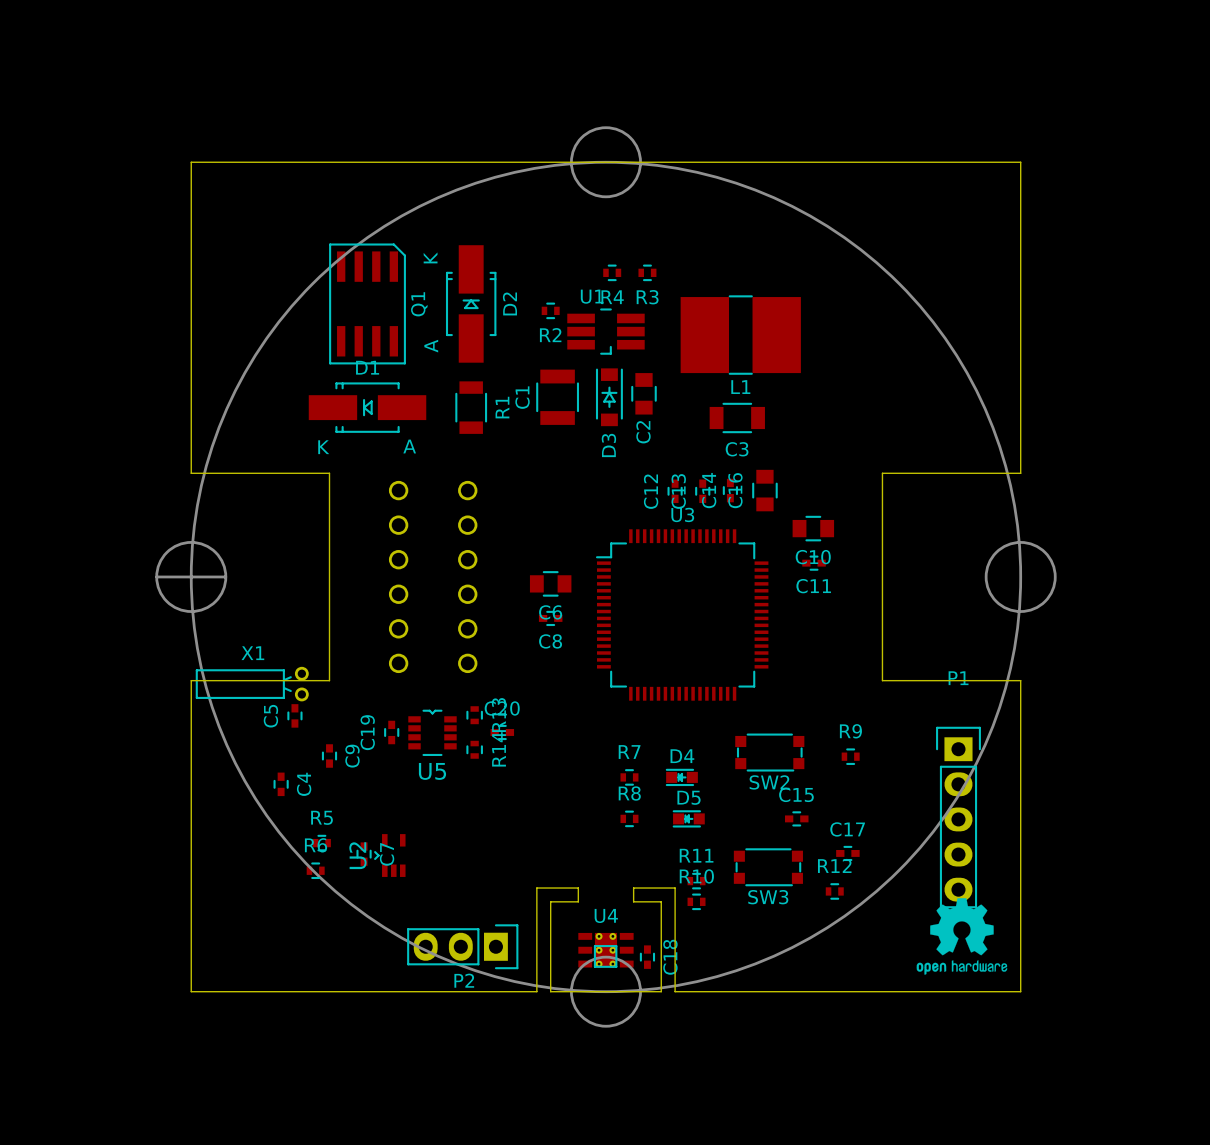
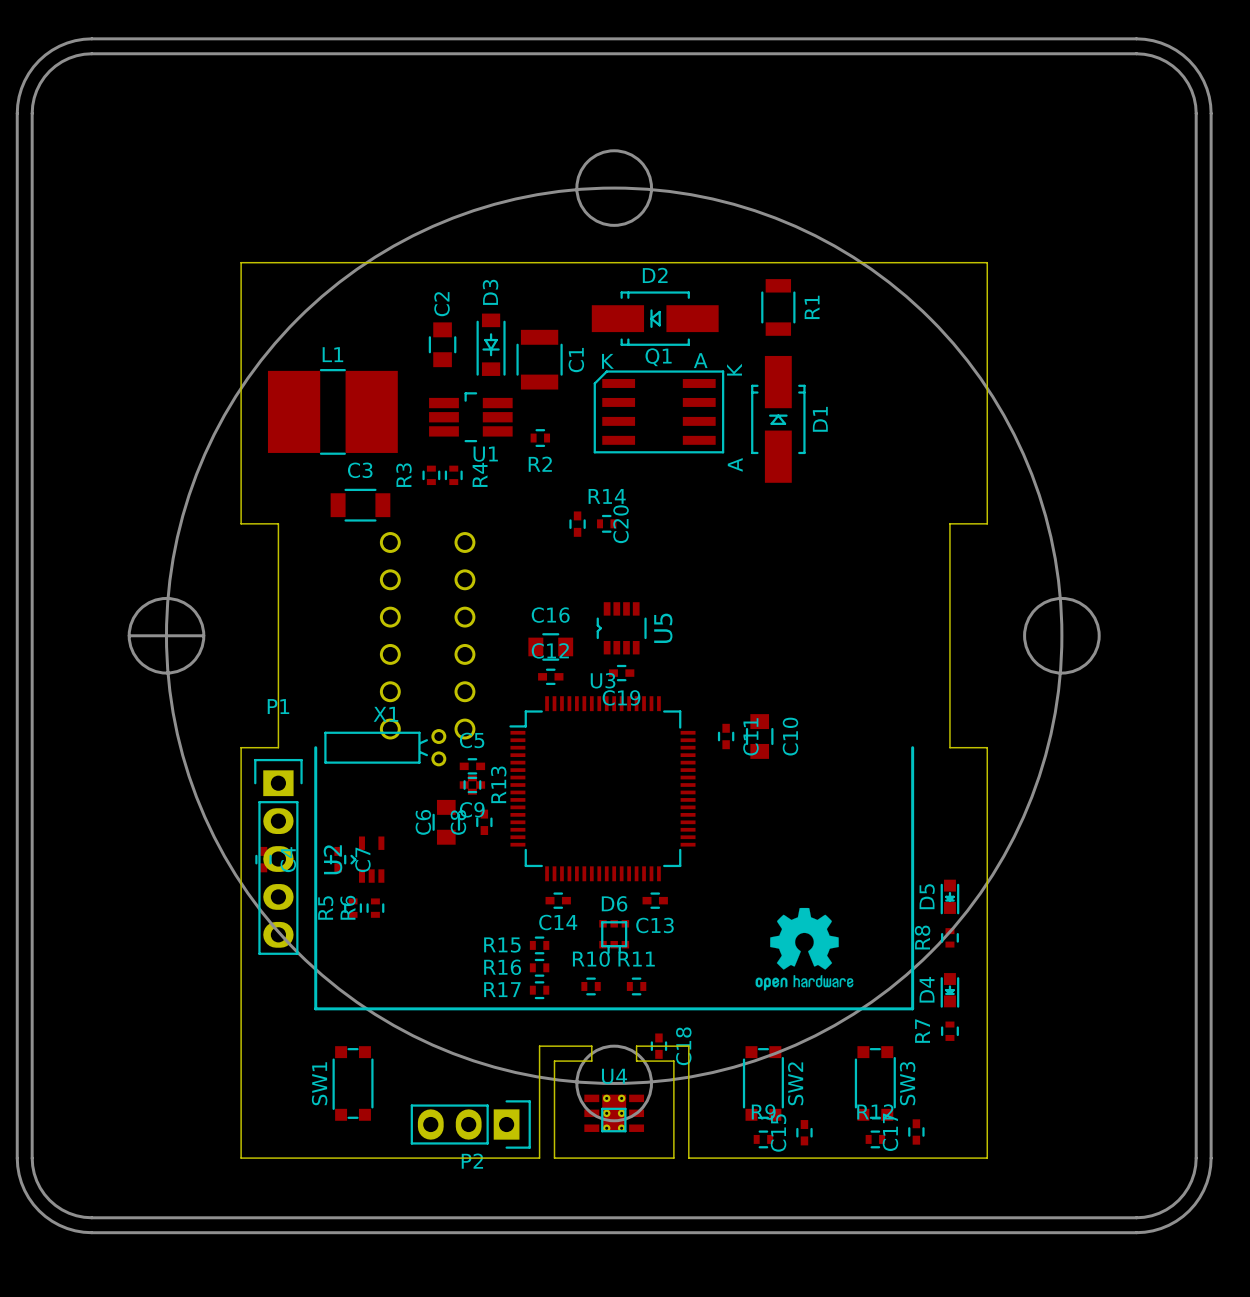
line: none -> (91, 38) (1136, 38) (1161, 43) (1176, 50) (1189, 60) (1199, 73) (1206, 88) (1211, 113) (1211, 1158) (1206, 1182) (1199, 1197) (1189, 1210) (1176, 1221) (1161, 1228) (1136, 1232) (91, 1232) (67, 1228) (52, 1221) (39, 1210) (28, 1197) (21, 1182) (17, 1158) (17, 113) (21, 88) (28, 73) (39, 60) (59, 46) (75, 40) (91, 38)
line: none -> (91, 53) (1136, 53) (1159, 58) (1178, 71) (1191, 90) (1196, 113) (1196, 1158) (1191, 1180) (1178, 1200) (1159, 1213) (1136, 1217) (91, 1217) (69, 1213) (49, 1200) (36, 1180) (32, 1158) (32, 113) (36, 90) (49, 71) (69, 58) (91, 53)
R4 rotation: 0° (612, 272) -> 90° clockwise (453, 475)
R4 position: (612, 272) -> (453, 475)
R3 rotation: 0° (647, 272) -> 90° clockwise (431, 475)
R3 position: (647, 272) -> (431, 475)
R4 name position: R4 (612, 297) -> R4 (480, 474)
Q1 rotation: 0° (367, 303) -> 90° counterclockwise (658, 411)
Q1 position: (367, 303) -> (658, 411)
D2 rotation: 0° (471, 303) -> 90° counterclockwise (655, 318)
D2 position: (471, 303) -> (655, 318)
R2 position: (550, 310) -> (540, 438)
U1 rotation: 0° (605, 331) -> 180° (470, 417)
U1 position: (605, 331) -> (470, 417)
L1 position: (740, 335) -> (332, 411)
L1 name position: L1 (740, 387) -> L1 (332, 354)
C2 position: (643, 393) -> (442, 344)
C1 name position: C1 (522, 397) -> C1 (576, 360)
C1 position: (557, 397) -> (539, 359)
D3 rotation: 0° (609, 397) -> 180° (491, 344)
D3 position: (609, 397) -> (491, 344)
D1 rotation: 0° (367, 407) -> 90° clockwise (778, 419)
D1 position: (367, 407) -> (778, 419)
R1 position: (471, 407) -> (778, 307)
C3 position: (737, 418) -> (360, 505)
C2 name position: C2 (643, 432) -> C2 (442, 304)
C3 name position: C3 (737, 449) -> C3 (360, 470)
board edge: (260, 473) (191, 473) (191, 162) (1020, 162) (1020, 473) (951, 473) -> (241, 523) (241, 262) (987, 262) (987, 523)
board edge: (294, 473) (329, 473) (329, 680) (294, 680) -> (278, 523) (278, 747)
board edge: (917, 473) (882, 473) (882, 680) (917, 680) -> (949, 523) (949, 747)
C14 name position: C14 (709, 490) -> C14 (558, 922)
C14 rotation: 0° (730, 490) -> 90° clockwise (558, 900)
C14 position: (730, 490) -> (558, 900)
C16 rotation: 0° (764, 490) -> 90° clockwise (550, 646)
C16 position: (764, 490) -> (550, 646)
C12 rotation: 0° (675, 491) -> 90° clockwise (550, 676)
C12 position: (675, 491) -> (550, 676)
C13 name position: C13 (678, 491) -> C13 (654, 925)
C13 rotation: 0° (702, 491) -> 90° clockwise (655, 900)
C13 position: (702, 491) -> (655, 900)
C10 rotation: 0° (813, 528) -> 90° clockwise (759, 736)
C10 position: (813, 528) -> (759, 736)
C10 name position: C10 (813, 557) -> C10 (790, 736)
C11 rotation: 0° (814, 563) -> 90° clockwise (726, 736)
C11 position: (814, 563) -> (726, 736)
C6 rotation: 0° (550, 583) -> 90° clockwise (446, 822)
C6 position: (550, 583) -> (446, 822)
C11 name position: C11 (813, 586) -> C11 (750, 736)
U3 position: (682, 614) -> (602, 788)
C8 rotation: 0° (550, 618) -> 90° clockwise (484, 822)
C8 position: (550, 618) -> (484, 822)
board edge: (260, 680) (191, 680) (191, 991) (536, 991) -> (241, 747) (241, 1158) (539, 1158) (539, 1083)
line: none -> (315, 747) (315, 1008) (912, 1008) (912, 747)
board edge: (951, 680) (1020, 680) (1020, 991) (675, 991) -> (987, 747) (987, 1158) (688, 1158) (688, 1083)
X1 position: (252, 684) -> (385, 747)
C5 rotation: 0° (294, 715) -> 90° clockwise (472, 766)
C5 position: (294, 715) -> (472, 766)
C19 name position: C19 (367, 732) -> C19 (621, 697)
C19 rotation: 0° (391, 732) -> 90° clockwise (621, 673)
C19 position: (391, 732) -> (621, 673)
U5 rotation: 0° (432, 732) -> 90° counterclockwise (621, 628)
U5 position: (432, 732) -> (621, 628)
C20 rotation: 0° (502, 732) -> 90° clockwise (577, 524)
C20 position: (502, 732) -> (577, 524)
R14 rotation: 0° (474, 749) -> 90° clockwise (606, 523)
R14 position: (474, 749) -> (606, 523)
R14 name position: R14 (499, 749) -> R14 (607, 496)
R7 name position: R7 (629, 752) -> R7 (922, 1031)
SW2 rotation: 0° (769, 752) -> 90° counterclockwise (763, 1083)
SW2 position: (769, 752) -> (763, 1083)
C9 rotation: 0° (329, 755) -> 90° clockwise (472, 785)
C9 position: (329, 755) -> (472, 785)
R9 position: (850, 756) -> (763, 1139)
R7 rotation: 0° (629, 777) -> 90° clockwise (949, 1031)
R7 position: (629, 777) -> (949, 1031)
D4 rotation: 0° (681, 777) -> 90° counterclockwise (949, 990)
D4 position: (681, 777) -> (949, 990)
R8 name position: R8 (629, 793) -> R8 (922, 937)
C15 name position: C15 (796, 794) -> C15 (778, 1133)
R5 name position: R5 (322, 817) -> R5 (325, 908)
P1 position: (958, 817) -> (278, 856)
R8 rotation: 0° (629, 818) -> 90° clockwise (949, 937)
R8 position: (629, 818) -> (949, 937)
D5 rotation: 0° (688, 818) -> 90° counterclockwise (949, 897)
D5 position: (688, 818) -> (949, 897)
C15 rotation: 0° (796, 818) -> 90° clockwise (804, 1132)
C15 position: (796, 818) -> (804, 1132)
C17 name position: C17 (847, 829) -> C17 (890, 1132)
R5 rotation: 0° (321, 843) -> 90° clockwise (353, 908)
R5 position: (321, 843) -> (353, 908)
R6 name position: R6 (316, 845) -> R6 (348, 907)
C17 rotation: 0° (847, 853) -> 90° clockwise (916, 1131)
C17 position: (847, 853) -> (916, 1131)
C7 position: (364, 854) -> (338, 859)
U2 position: (389, 855) -> (367, 859)
D6: none -> (614, 937)
R15: none -> (539, 945)
SW3 rotation: 0° (768, 867) -> 90° counterclockwise (875, 1083)
SW3 position: (768, 867) -> (875, 1083)
R6 rotation: 0° (315, 870) -> 90° clockwise (375, 908)
R6 position: (315, 870) -> (375, 908)
R11 position: (696, 881) -> (636, 986)
R16: none -> (539, 967)
R12 position: (834, 891) -> (875, 1139)
R10 position: (696, 901) -> (591, 986)
R17: none -> (539, 990)
drawing position: (961, 936) -> (804, 949)
P2 position: (462, 946) -> (470, 1124)
U4 position: (605, 950) -> (614, 1113)
board edge: (536, 957) (536, 888) (578, 888) (578, 901) (550, 901) (550, 970) -> (539, 1046) (591, 1046) (591, 1061) (554, 1061)
board edge: (675, 957) (675, 888) (633, 888) (633, 901) (661, 901) (661, 970) -> (688, 1046) (636, 1046) (636, 1061) (673, 1061)
SW1: none -> (353, 1083)
board edge: (550, 991) (661, 991) -> (554, 1083) (554, 1158) (673, 1158) (673, 1083)

